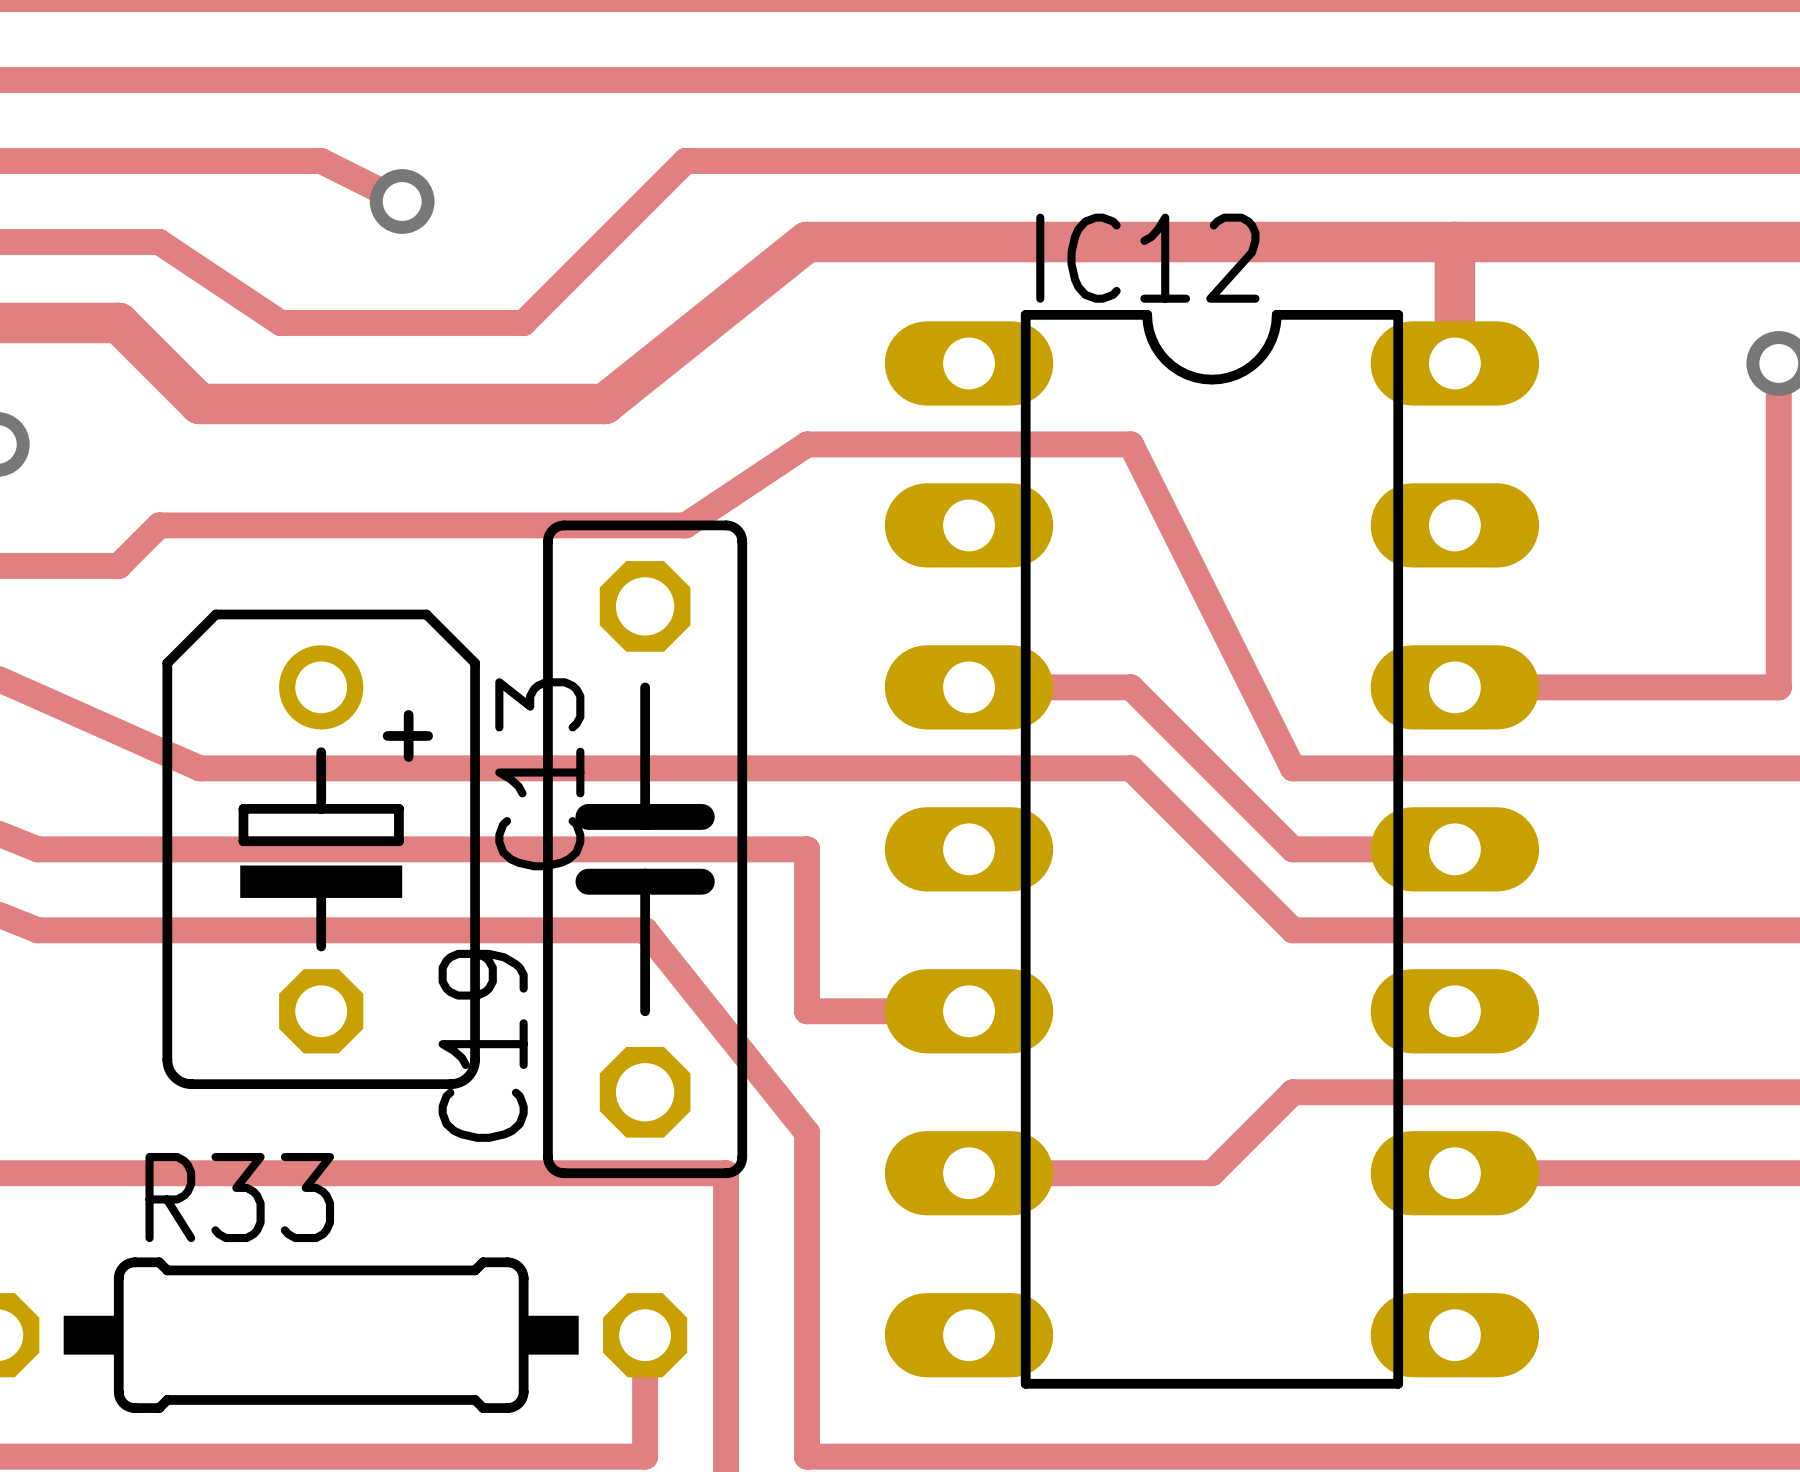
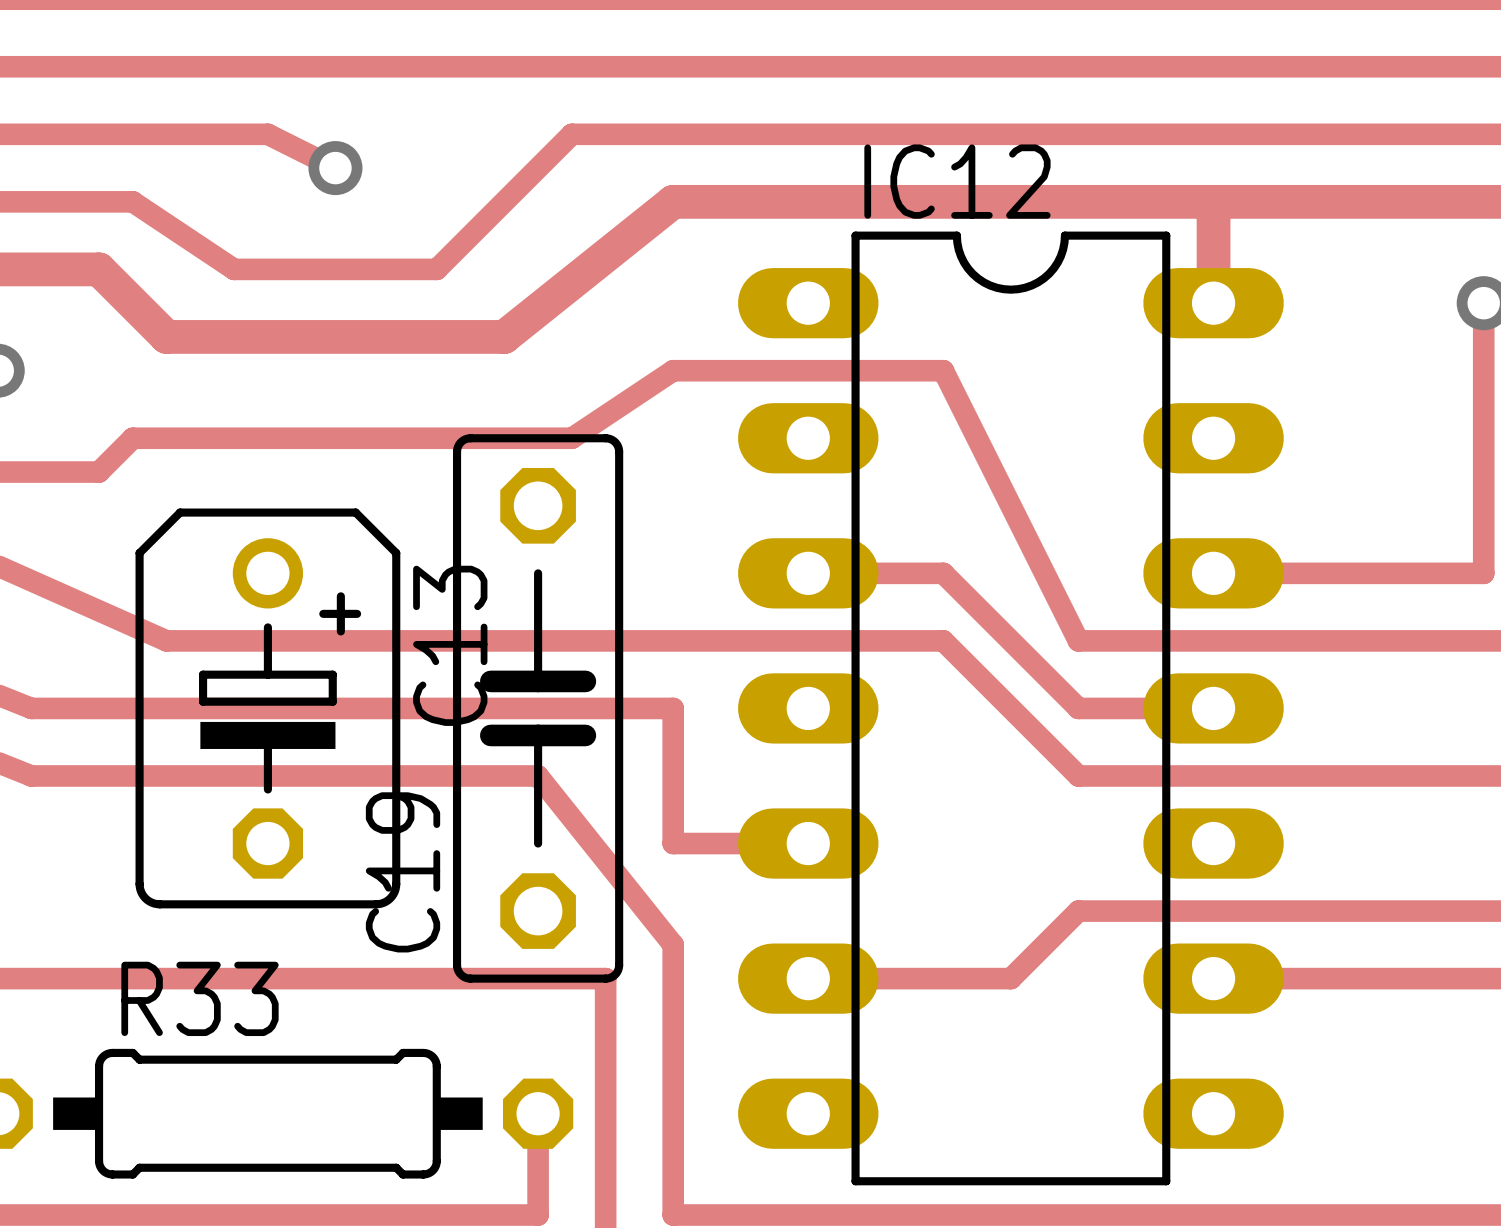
IC12 name position: IC12 (1147, 258) -> IC12 (957, 181)
IC12 footprint: [884, 310, 1540, 1389] -> [738, 231, 1284, 1186]

